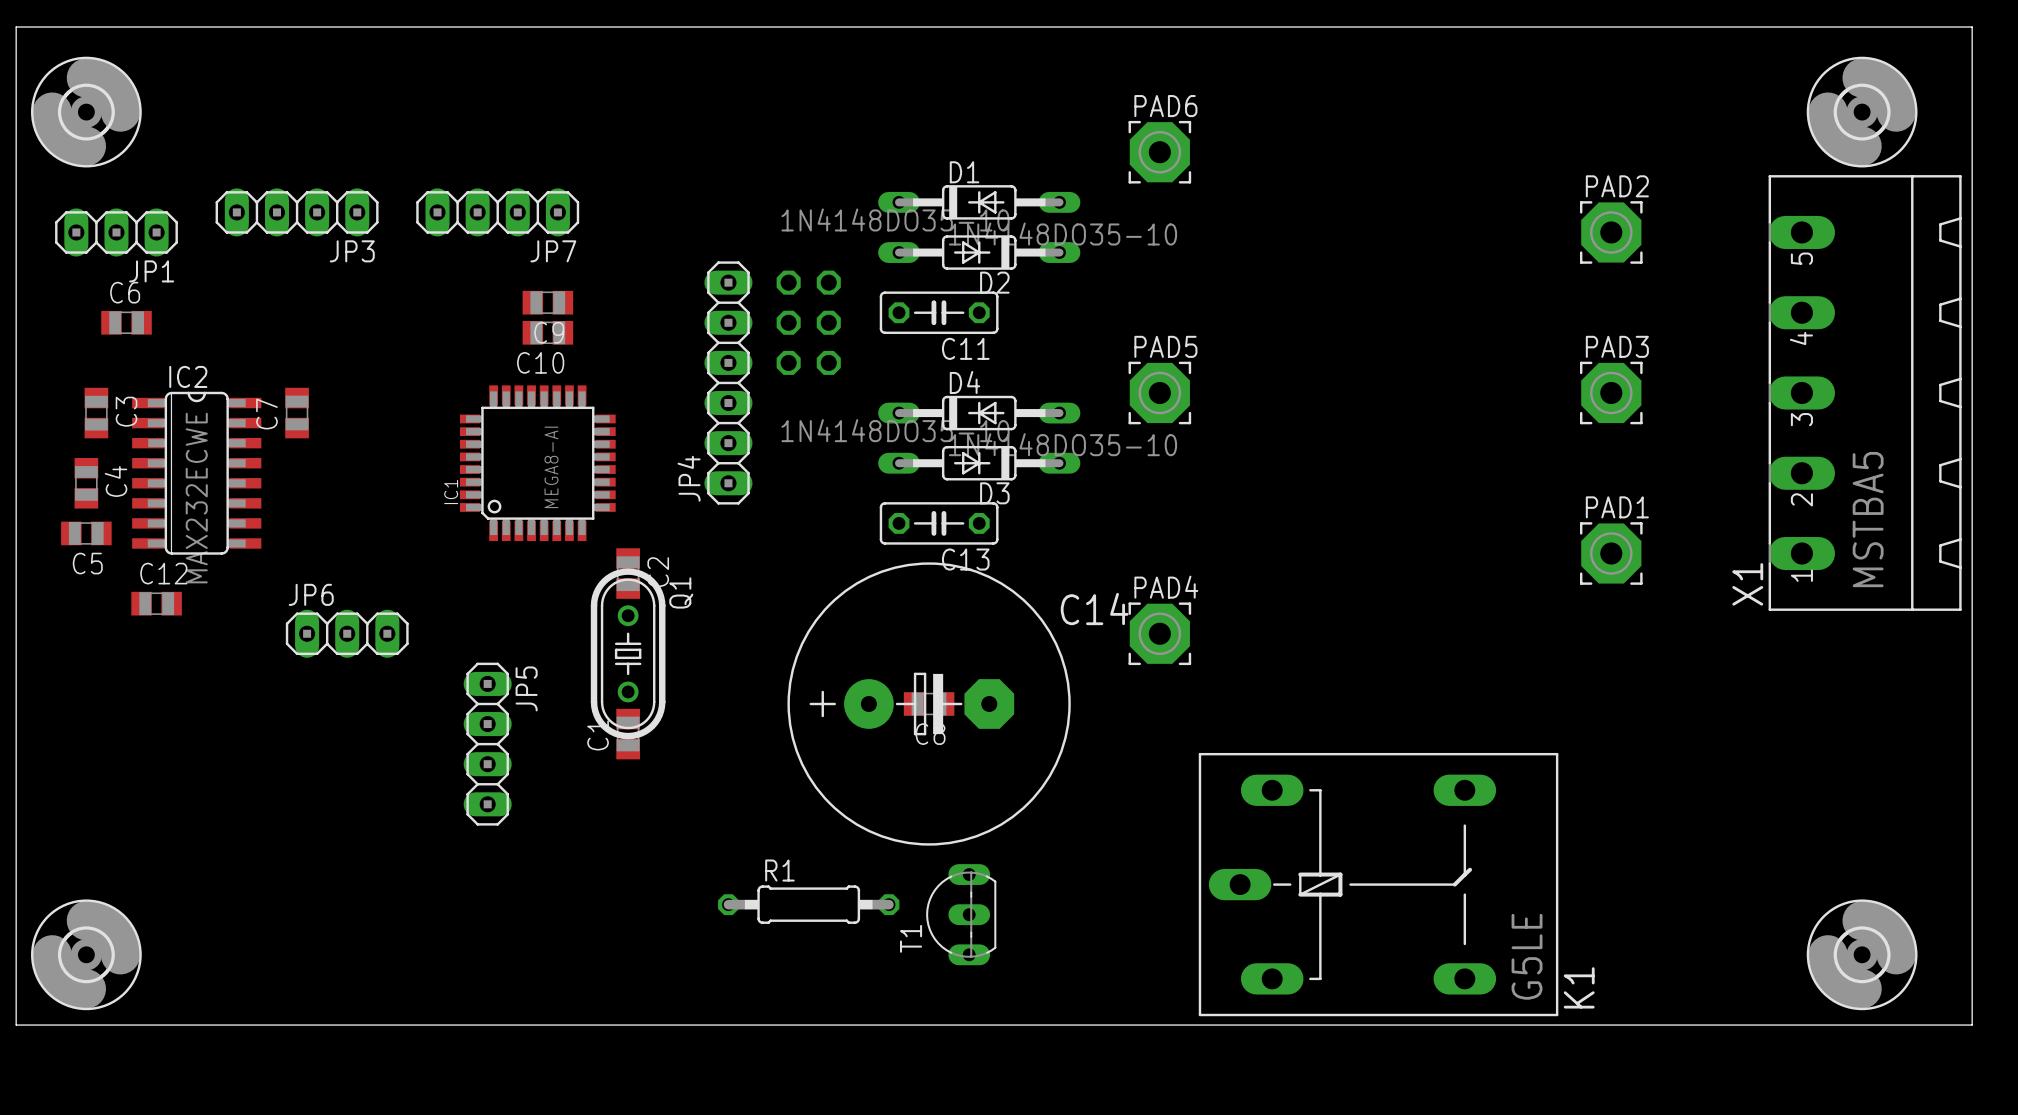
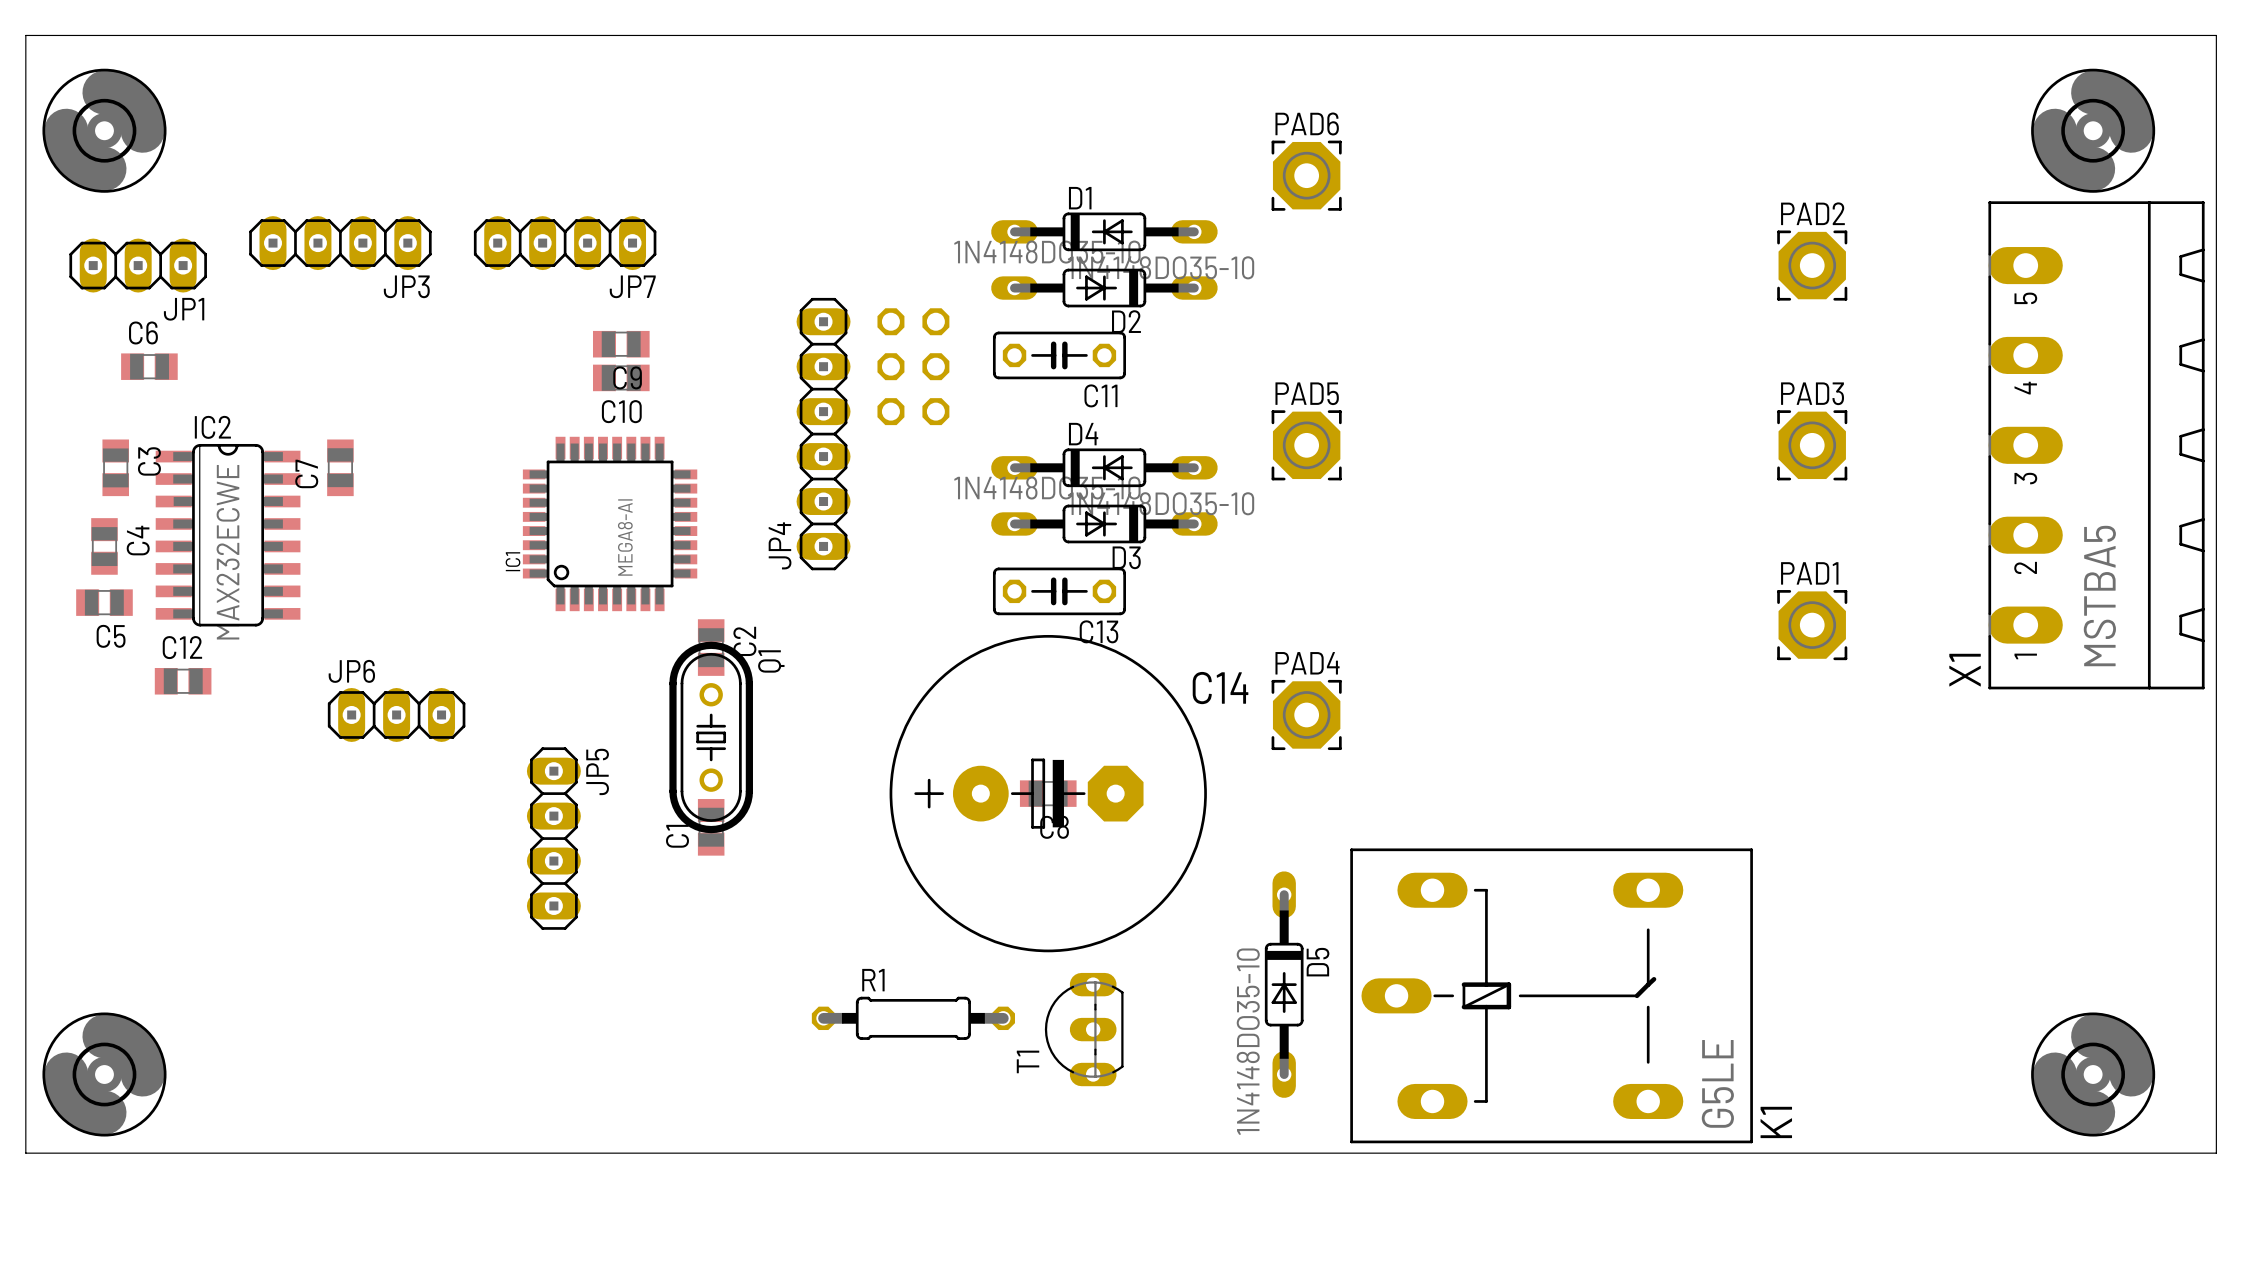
D5: none -> 1N4148DO35-10 (1284, 984)

